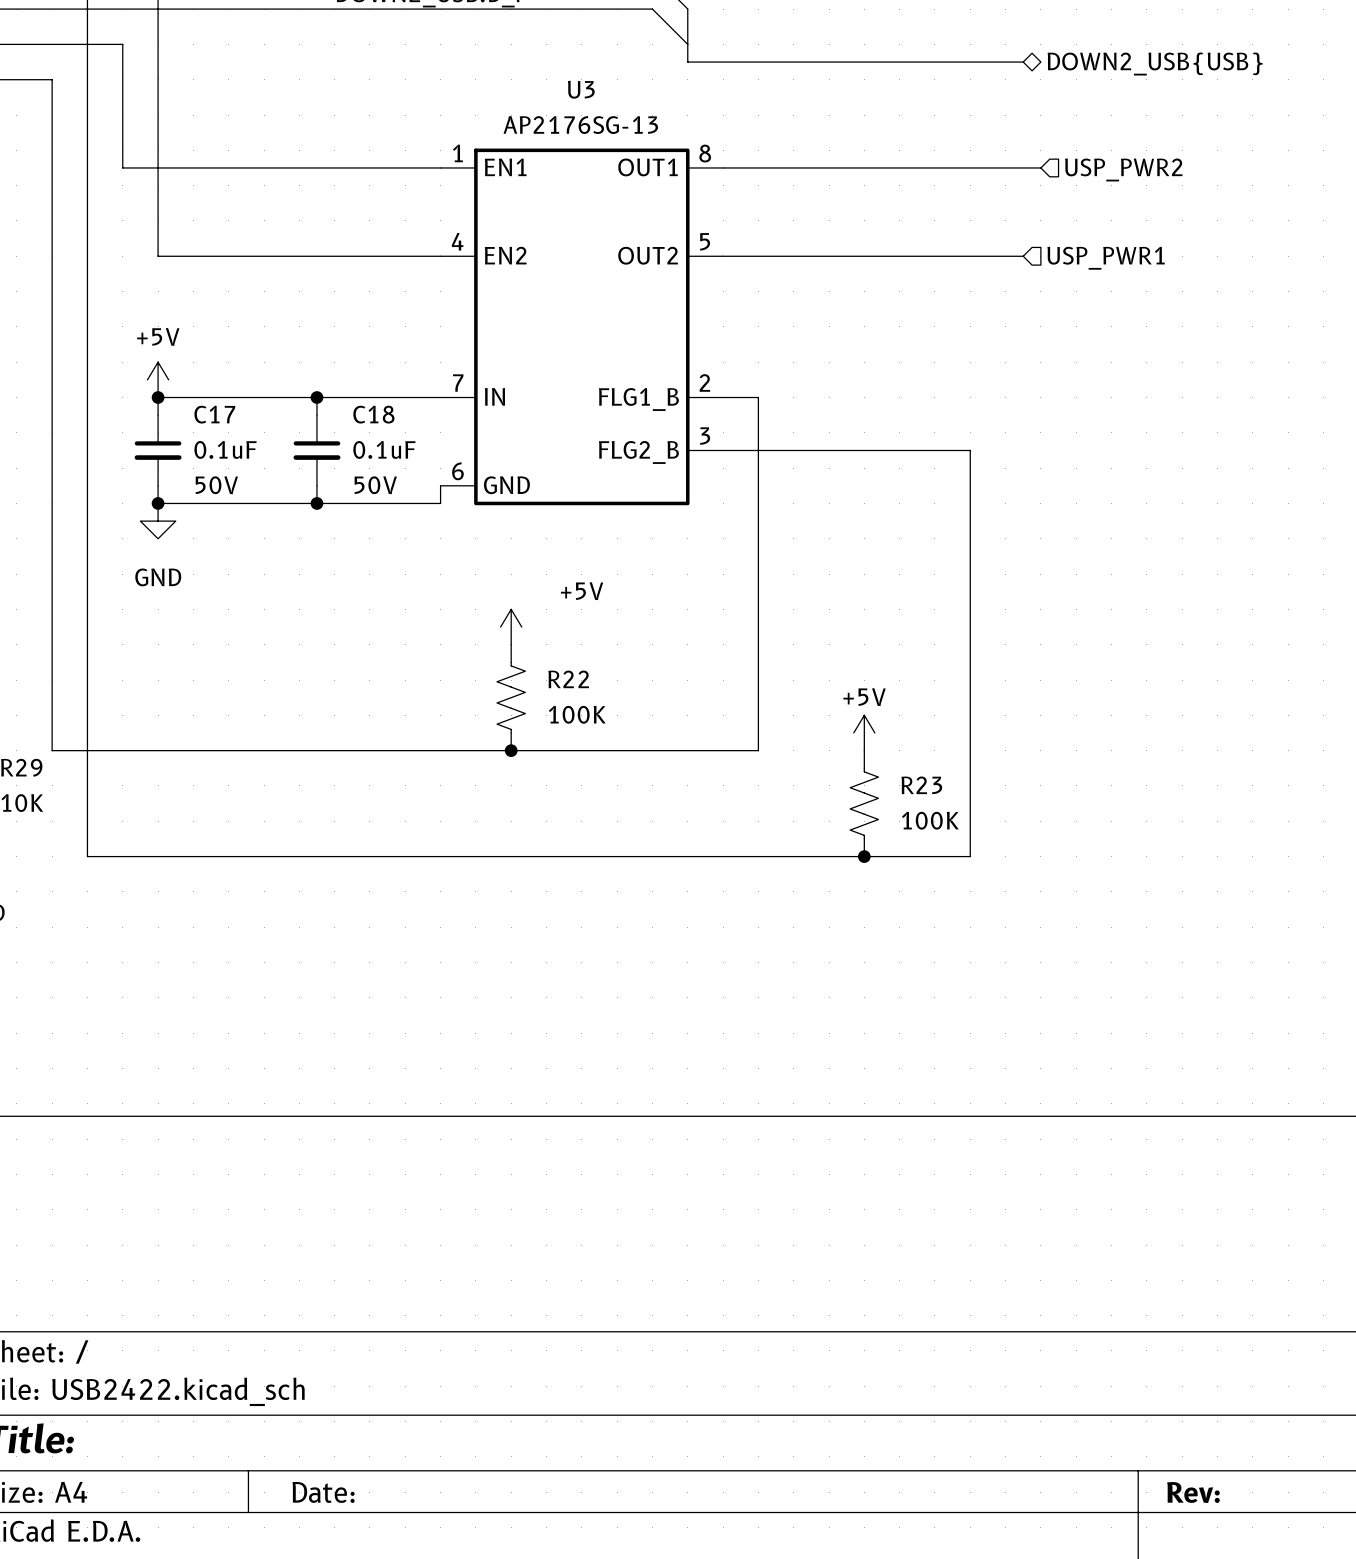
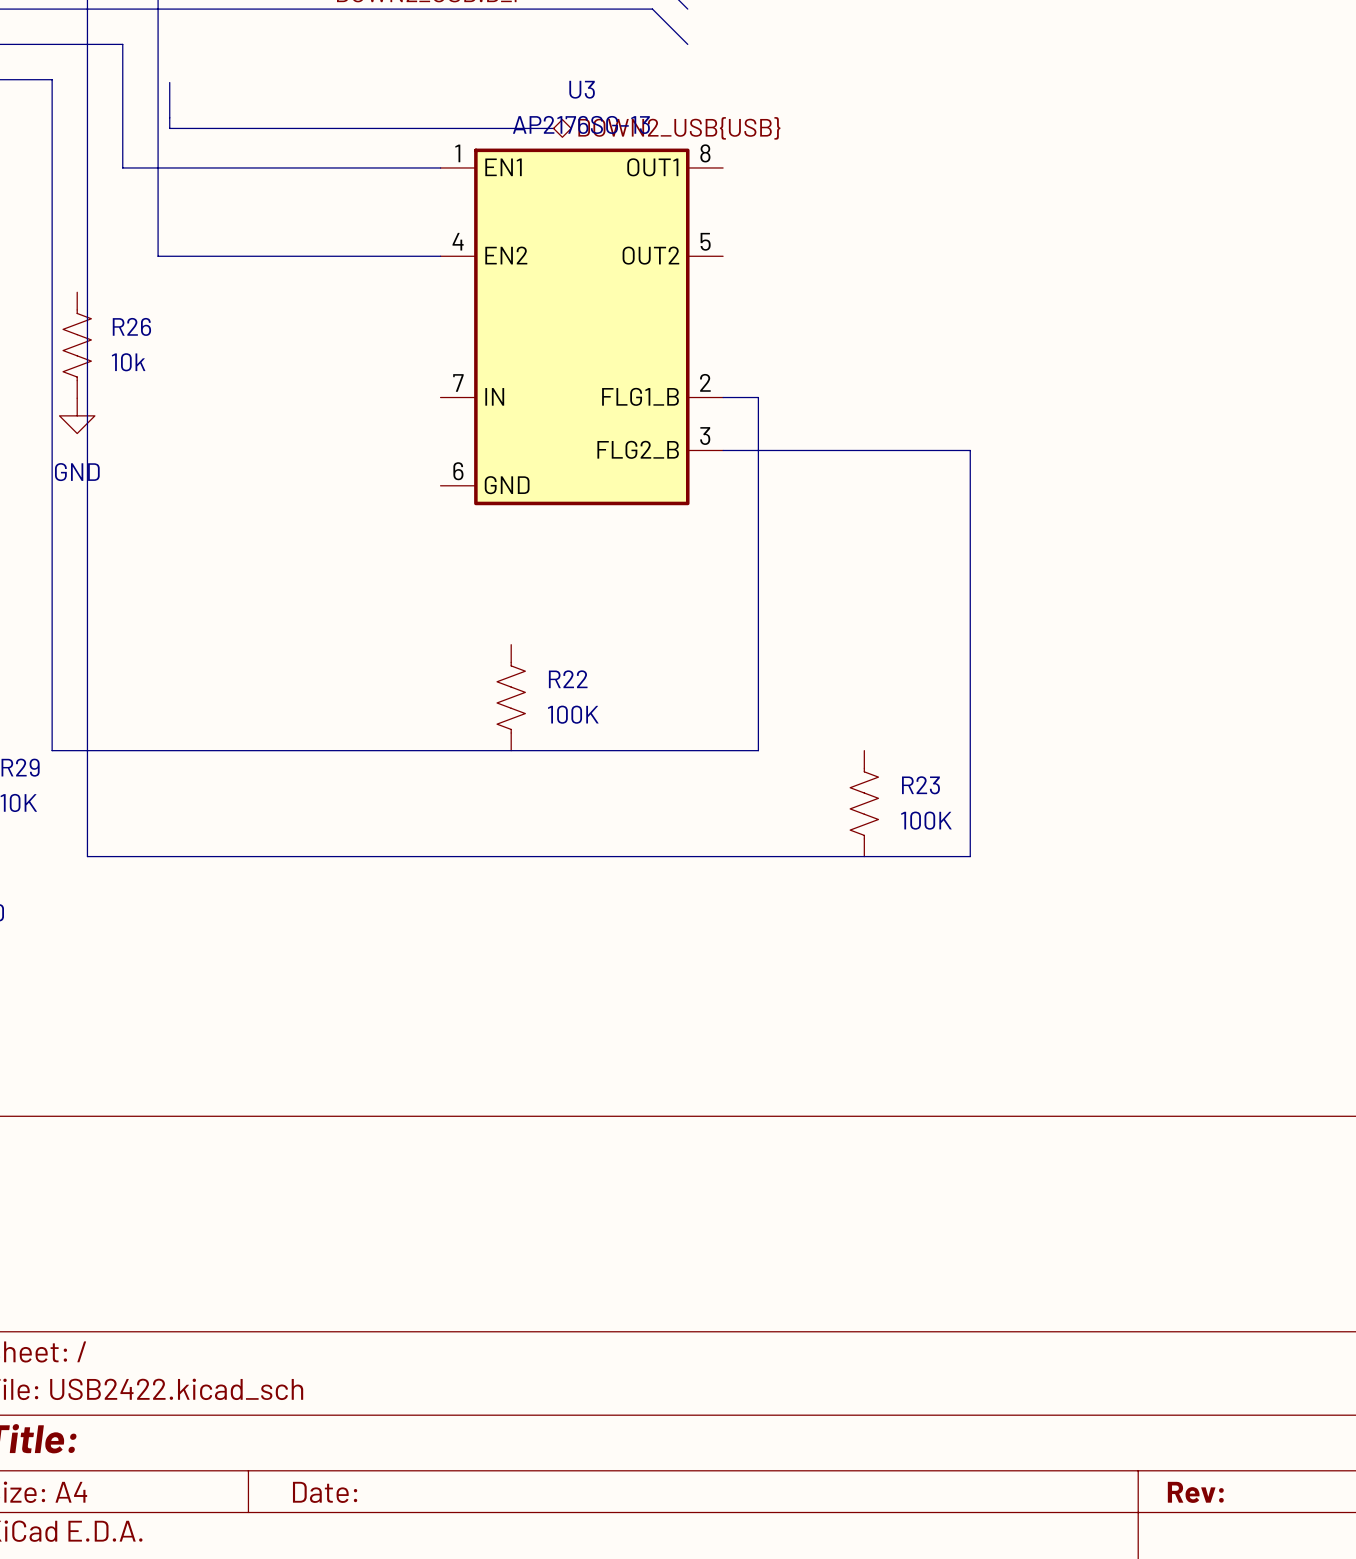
bus: (687, 9) (687, 62) (1023, 62) -> none
hierarchical label: DOWN2_USB{USB} (1155, 64) -> none
bus: none -> (169, 82) (169, 128) (554, 128)
hierarchical label: none -> DOWN2_USB{USB} (679, 128)
wire: (723, 167) (1040, 167) -> none
hierarchical label: USP_PWR2 (1123, 169) -> none
wire: (723, 256) (1023, 256) -> none
hierarchical label: USP_PWR1 (1106, 258) -> none
R26: none -> 10k (77, 345)
power symbol: +5V (158, 379) -> none
junction: (158, 397) -> none
wire: (316, 397) (316, 415) -> none
junction: (316, 397) -> none
wire: (440, 397) (158, 397) (158, 415) -> none
C17: 0.1uF (158, 450) -> none
C18: 0.1uF (316, 450) -> none
wire: (158, 485) (158, 503) (440, 503) (440, 485) -> none
wire: (316, 485) (316, 503) -> none
junction: (158, 503) -> none
junction: (316, 503) -> none
power symbol position: GND (158, 521) -> GND (77, 415)
power symbol: +5V (511, 627) -> none
power symbol: +5V (864, 732) -> none
junction: (511, 750) -> none
junction: (864, 856) -> none

